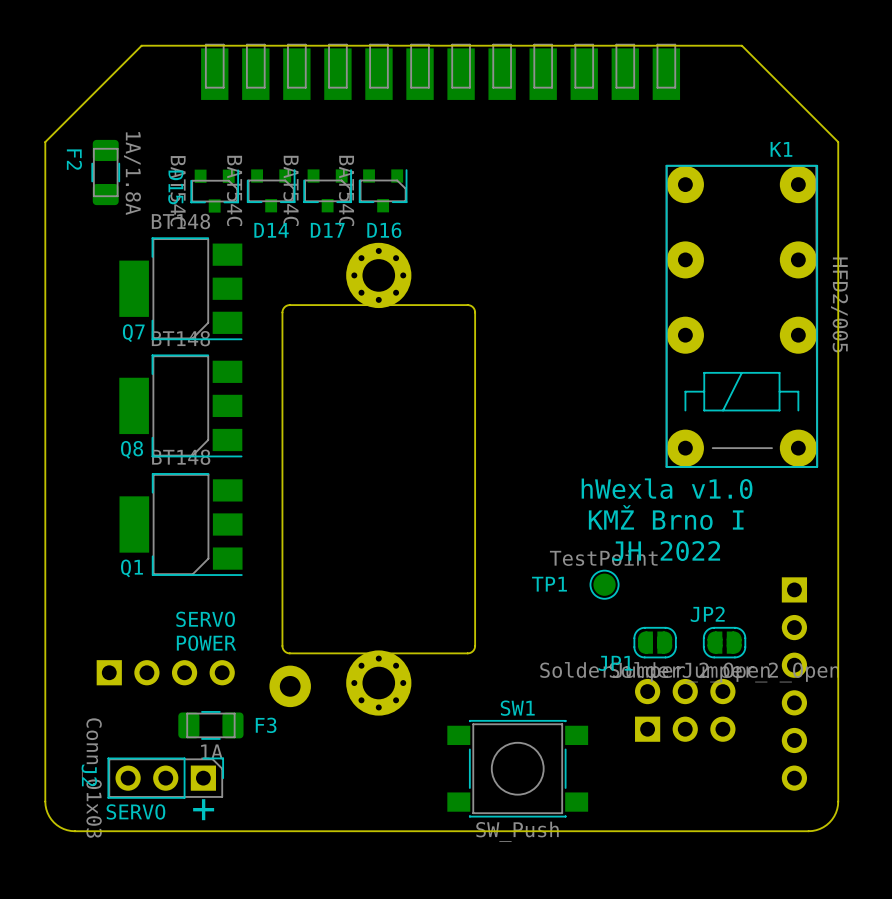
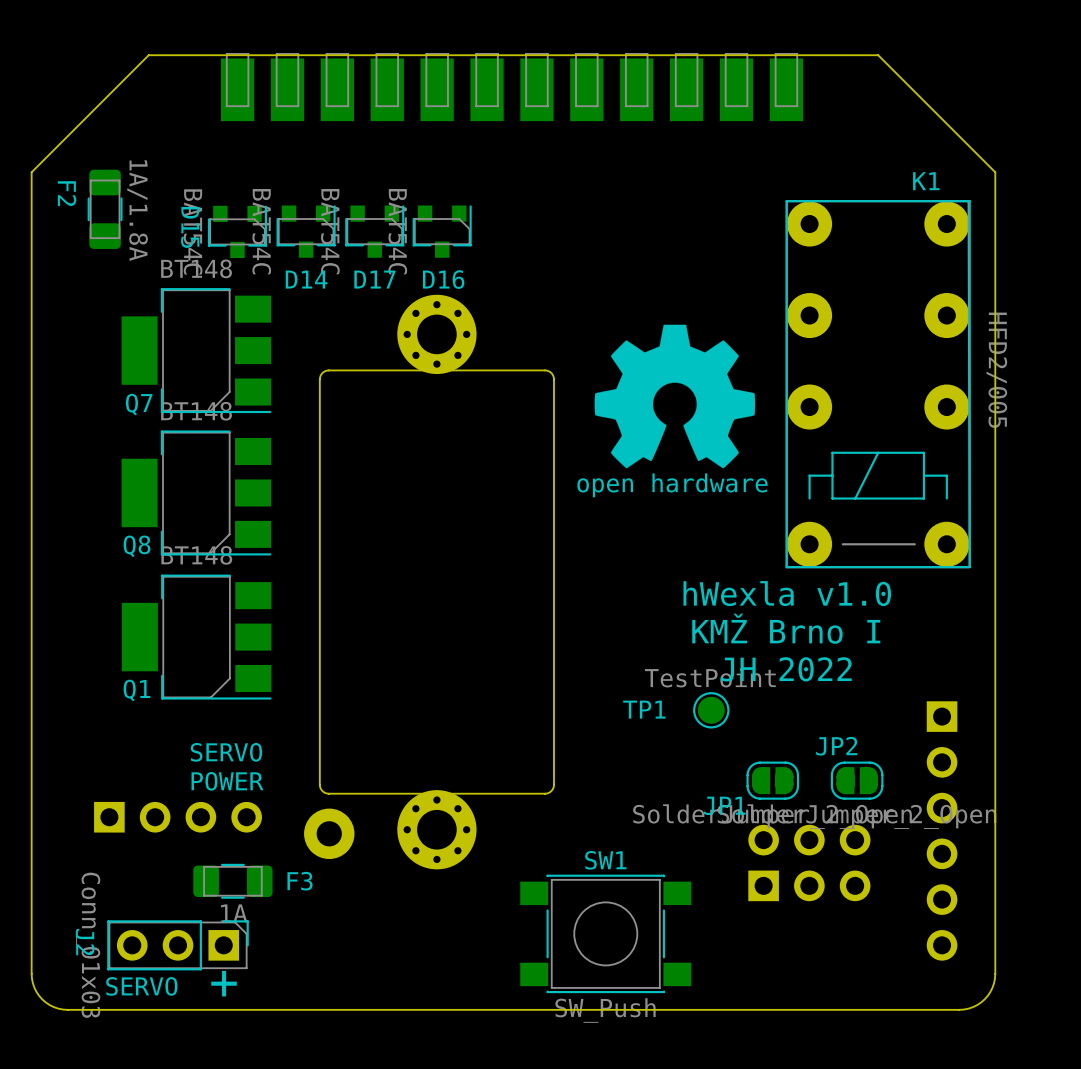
drawing: none -> [594, 324, 756, 469]
text: none -> open hardware (672, 485)

